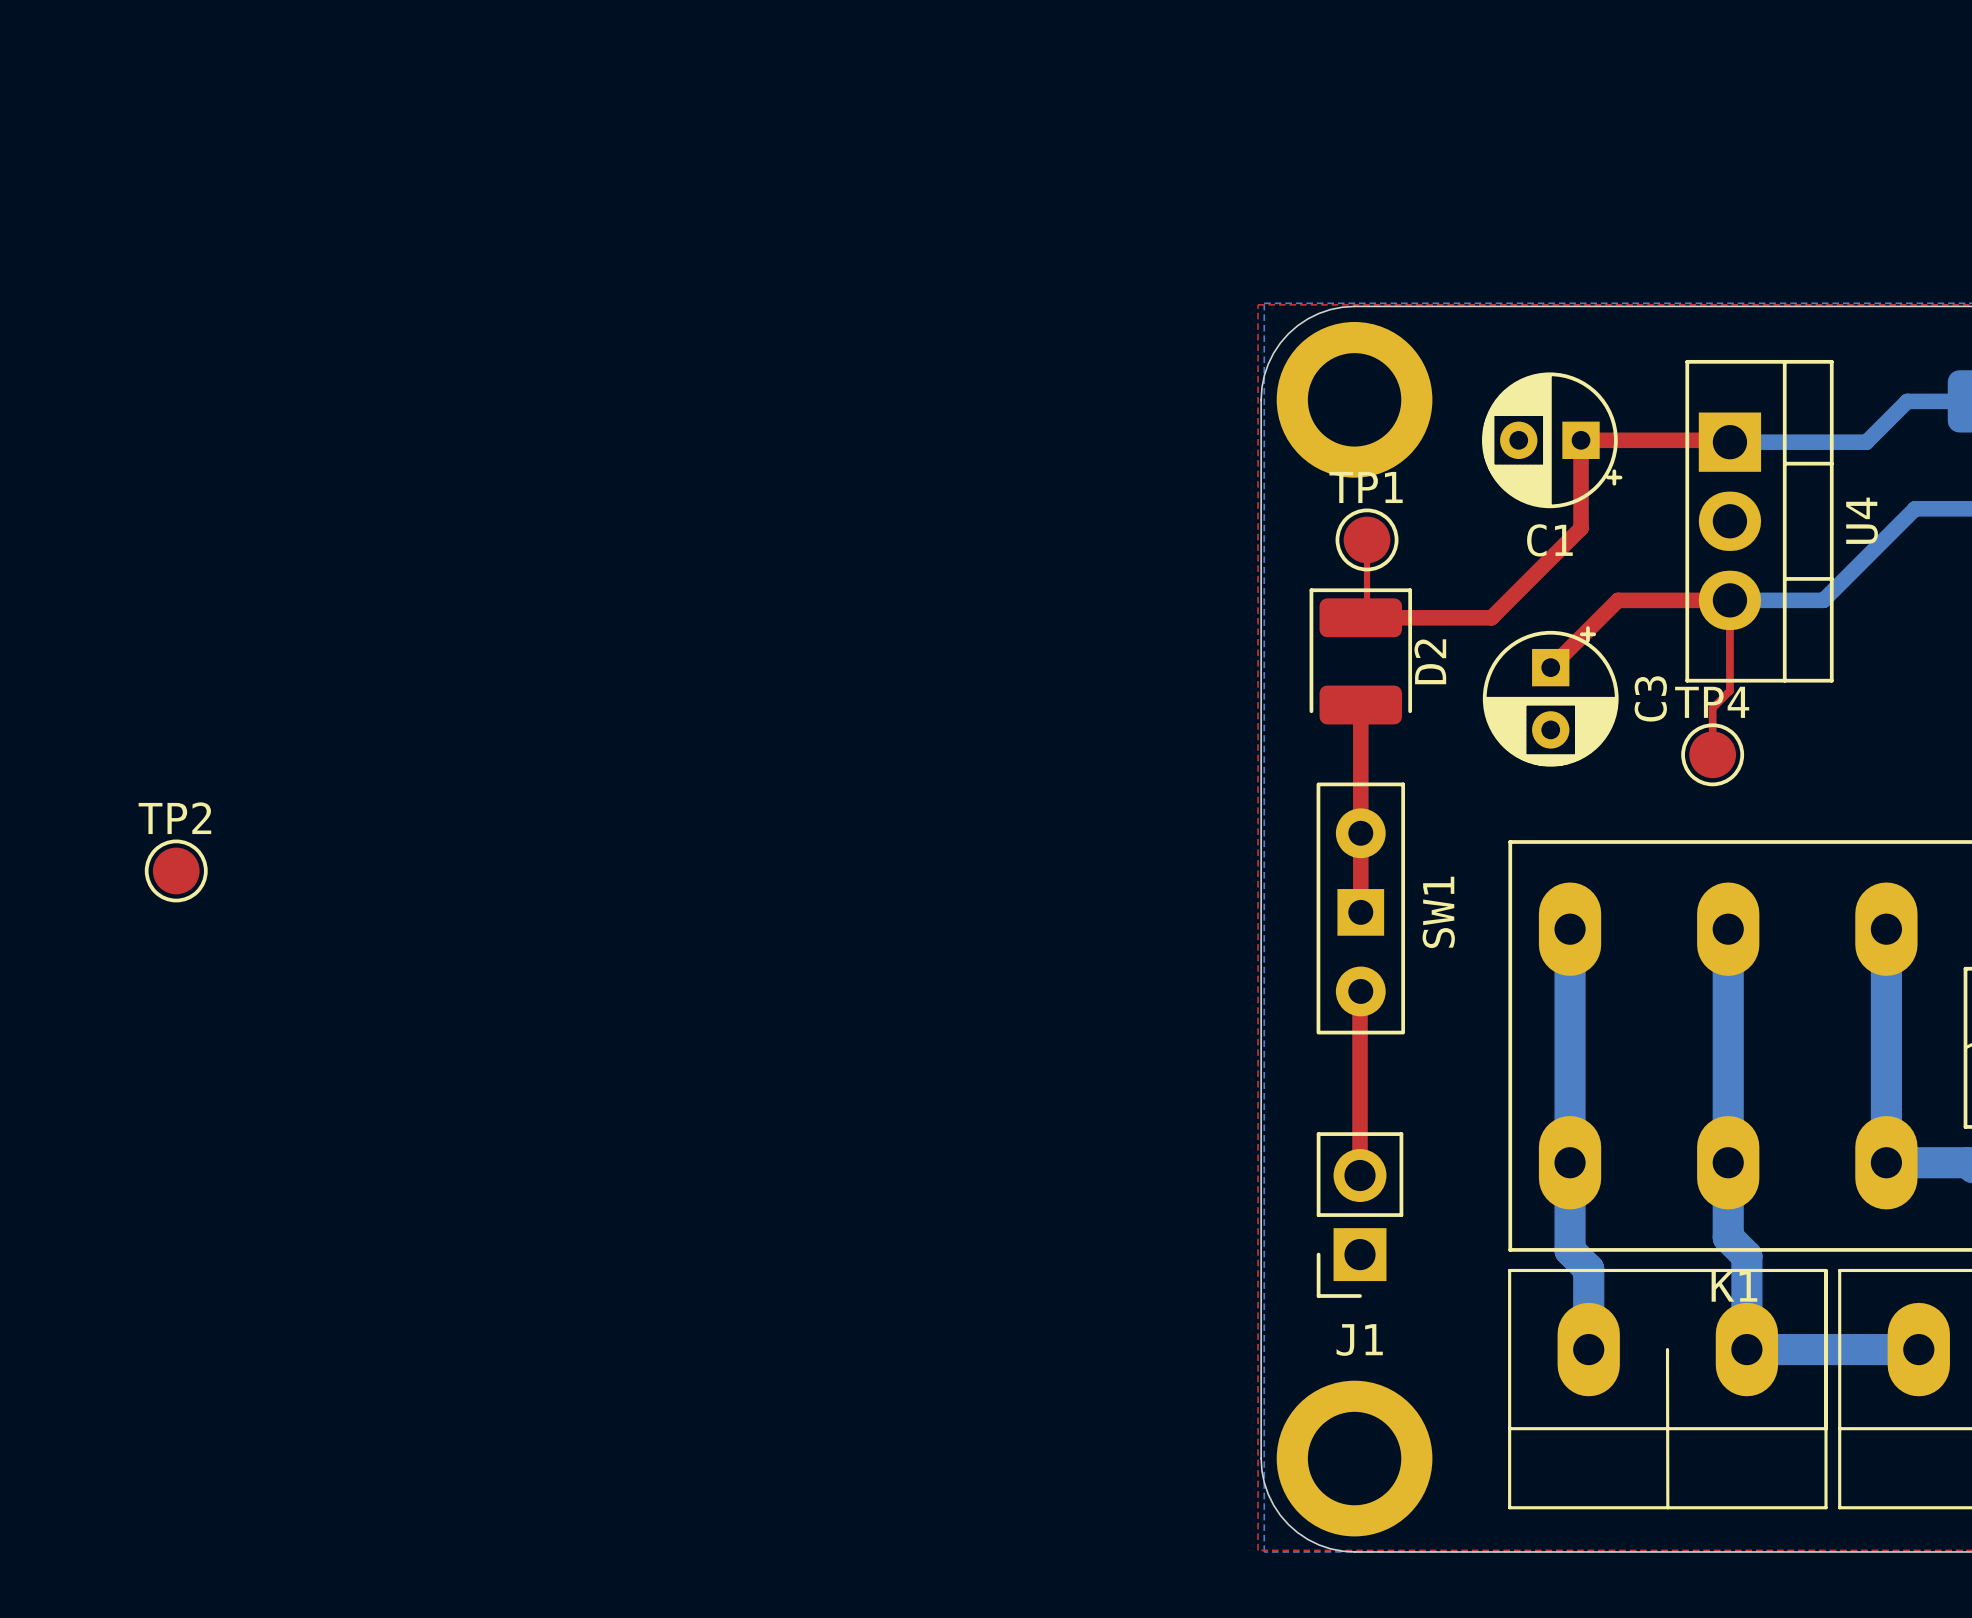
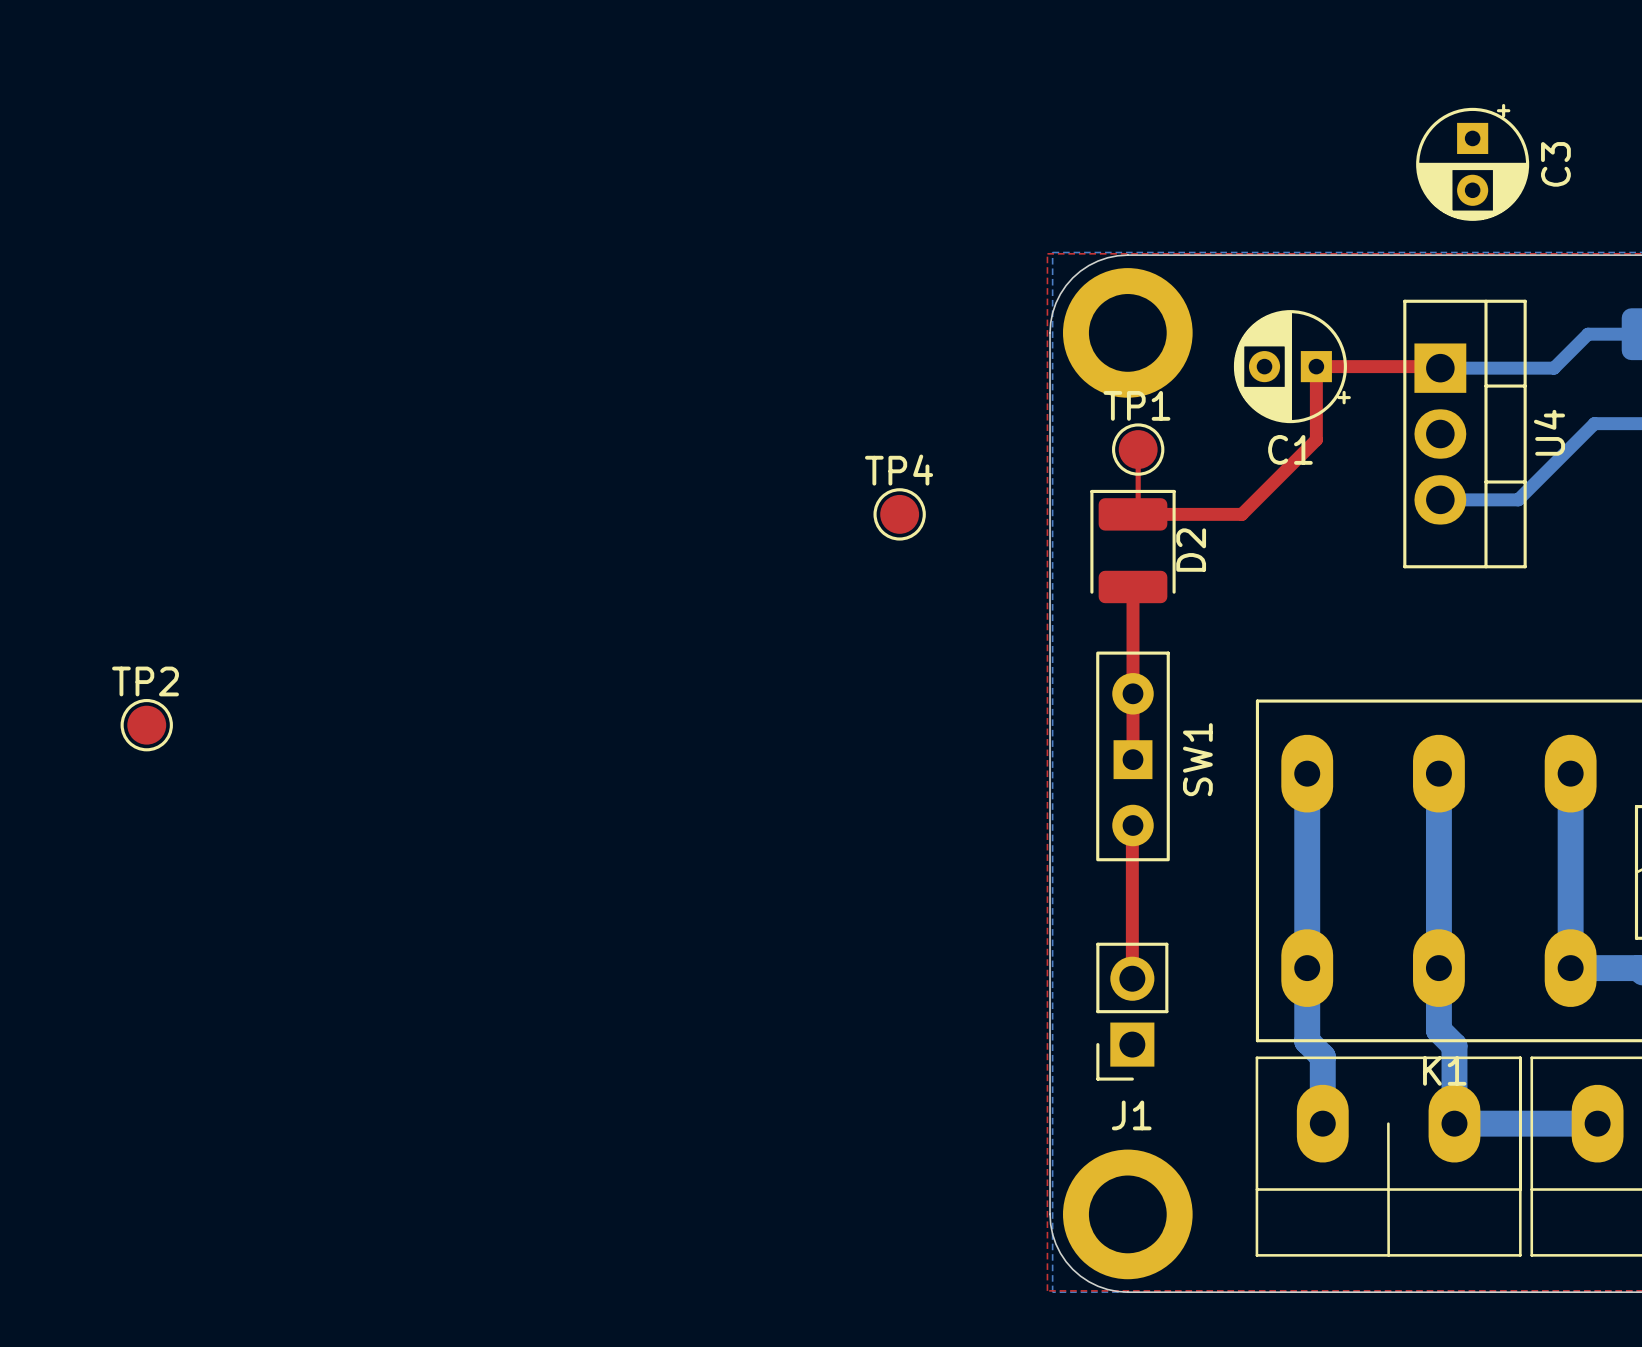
top track: (1550, 667) (1618, 600) (1729, 600) (1729, 690) (1712, 708) (1712, 754) -> none
C3 position: (1550, 696) -> (1472, 162)
TP4 position: (1712, 754) -> (899, 514)

